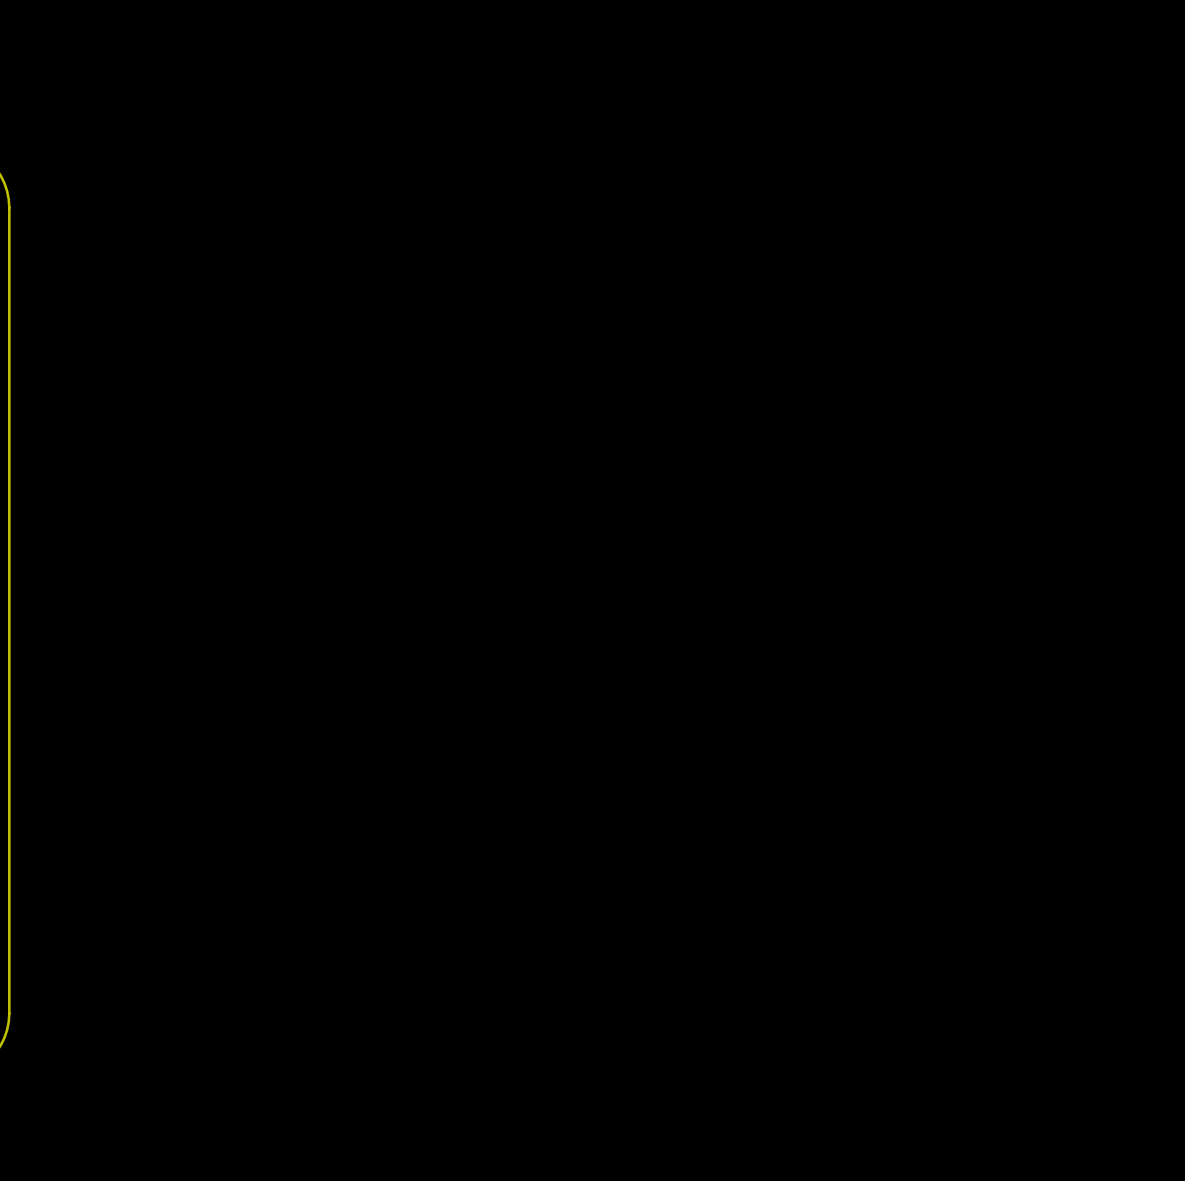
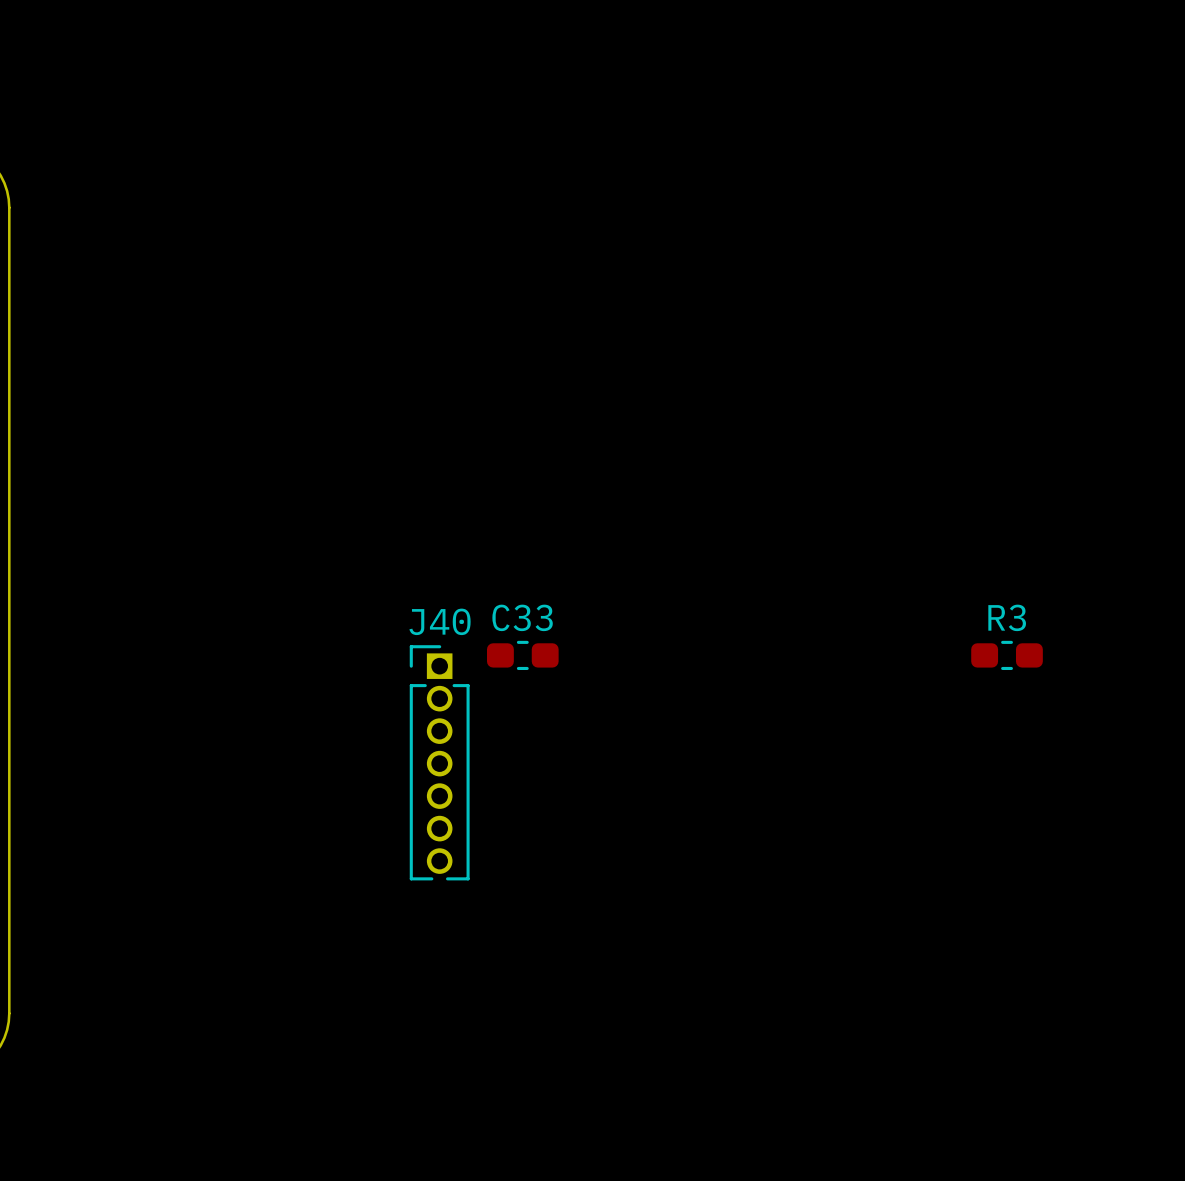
C33: none -> (522, 655)
R3: none -> (1007, 655)
J40: none -> (439, 762)

